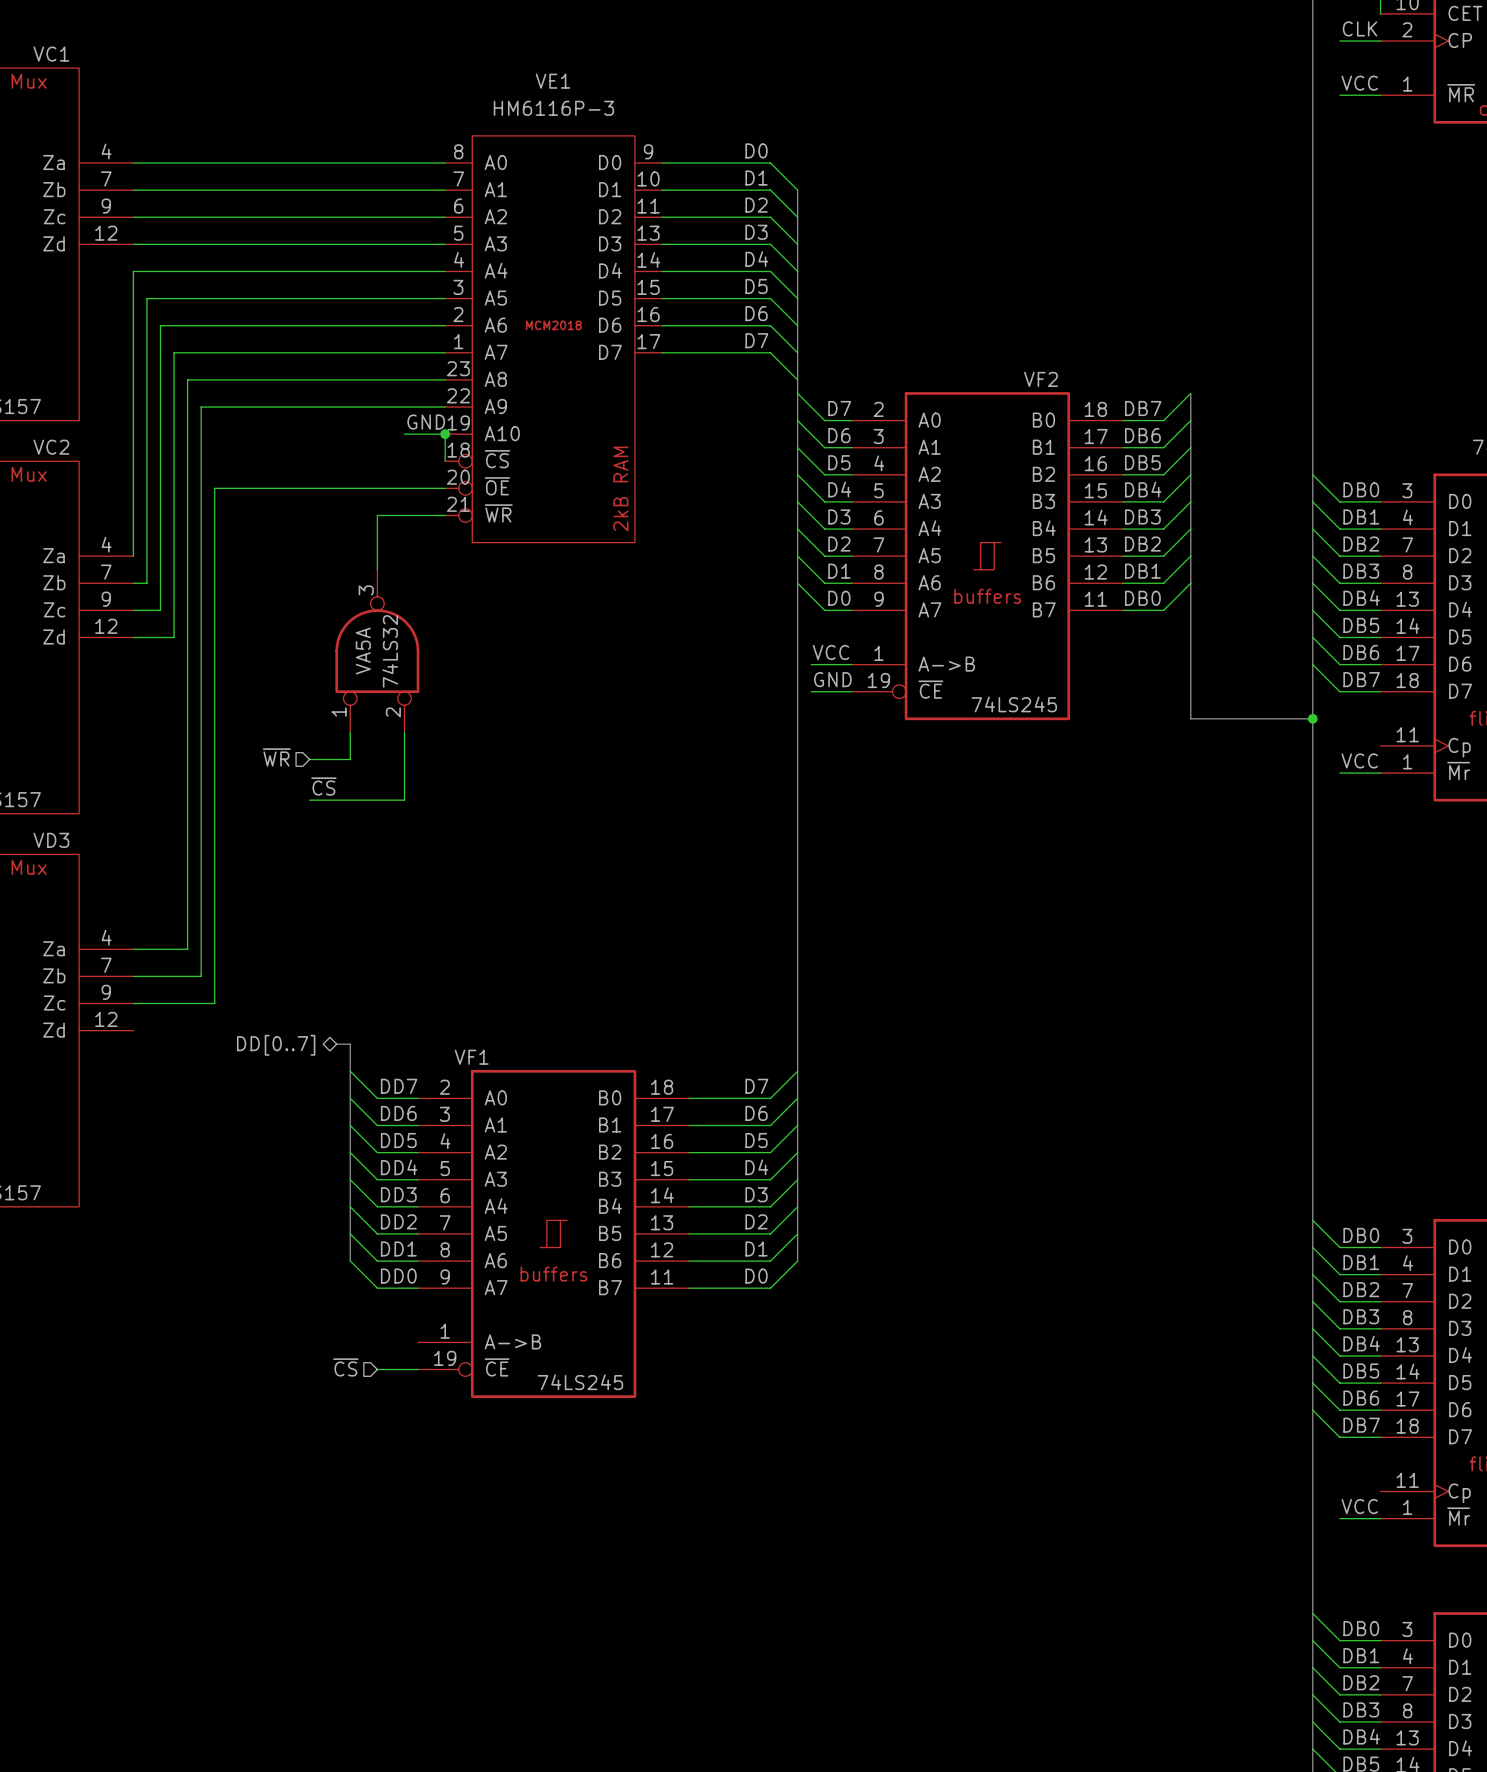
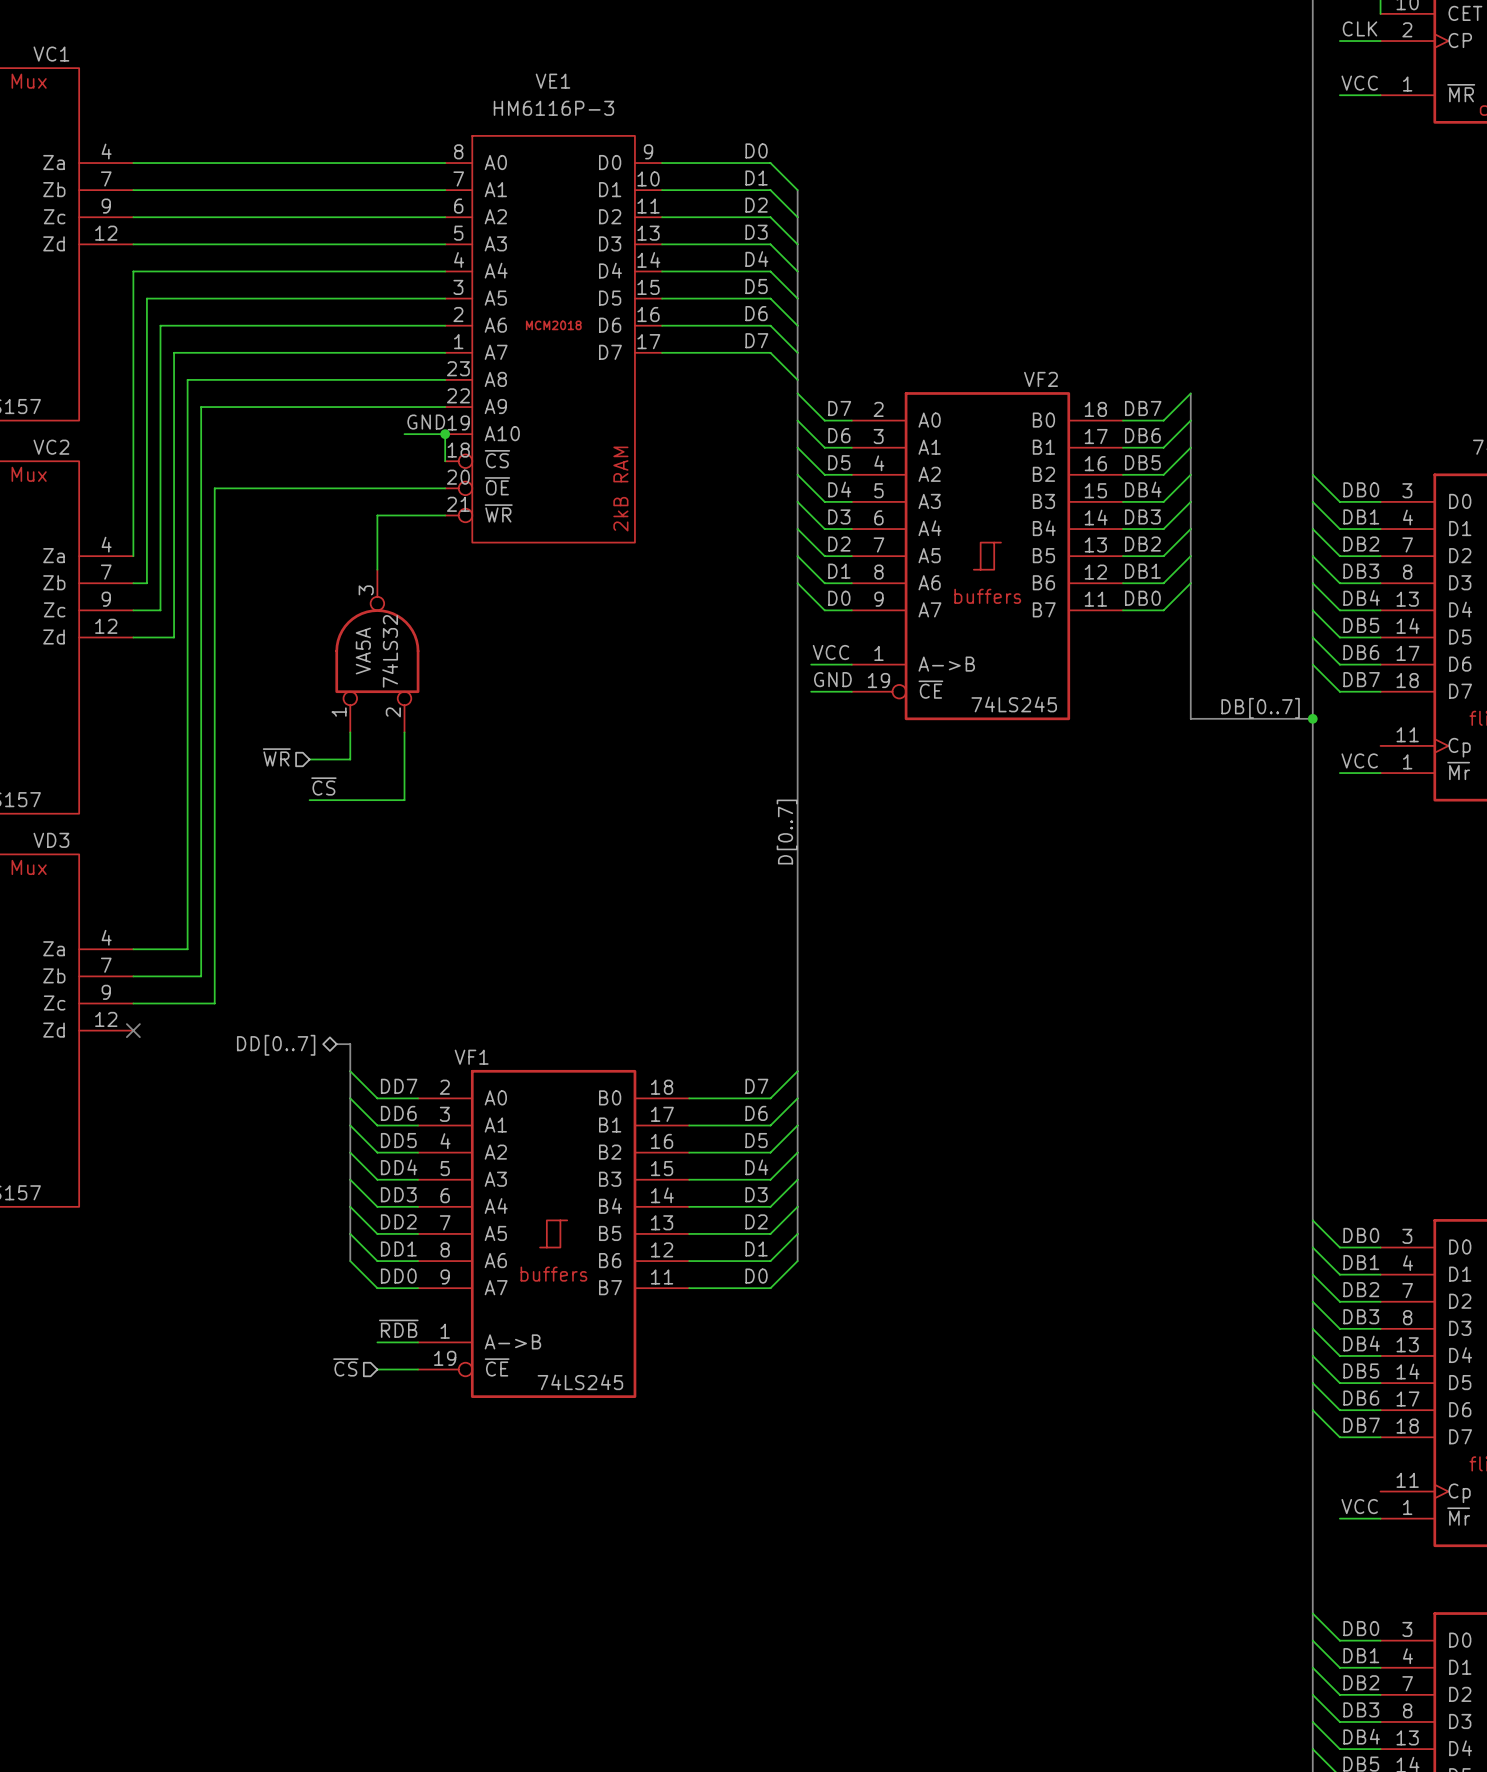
label: none -> DB[0..7] (1260, 708)
label: none -> D[0..7] (787, 832)
no-connect mark: none -> (133, 1030)
label: none -> ~{RDB} (398, 1328)
wire: none -> (377, 1342) (418, 1342)

